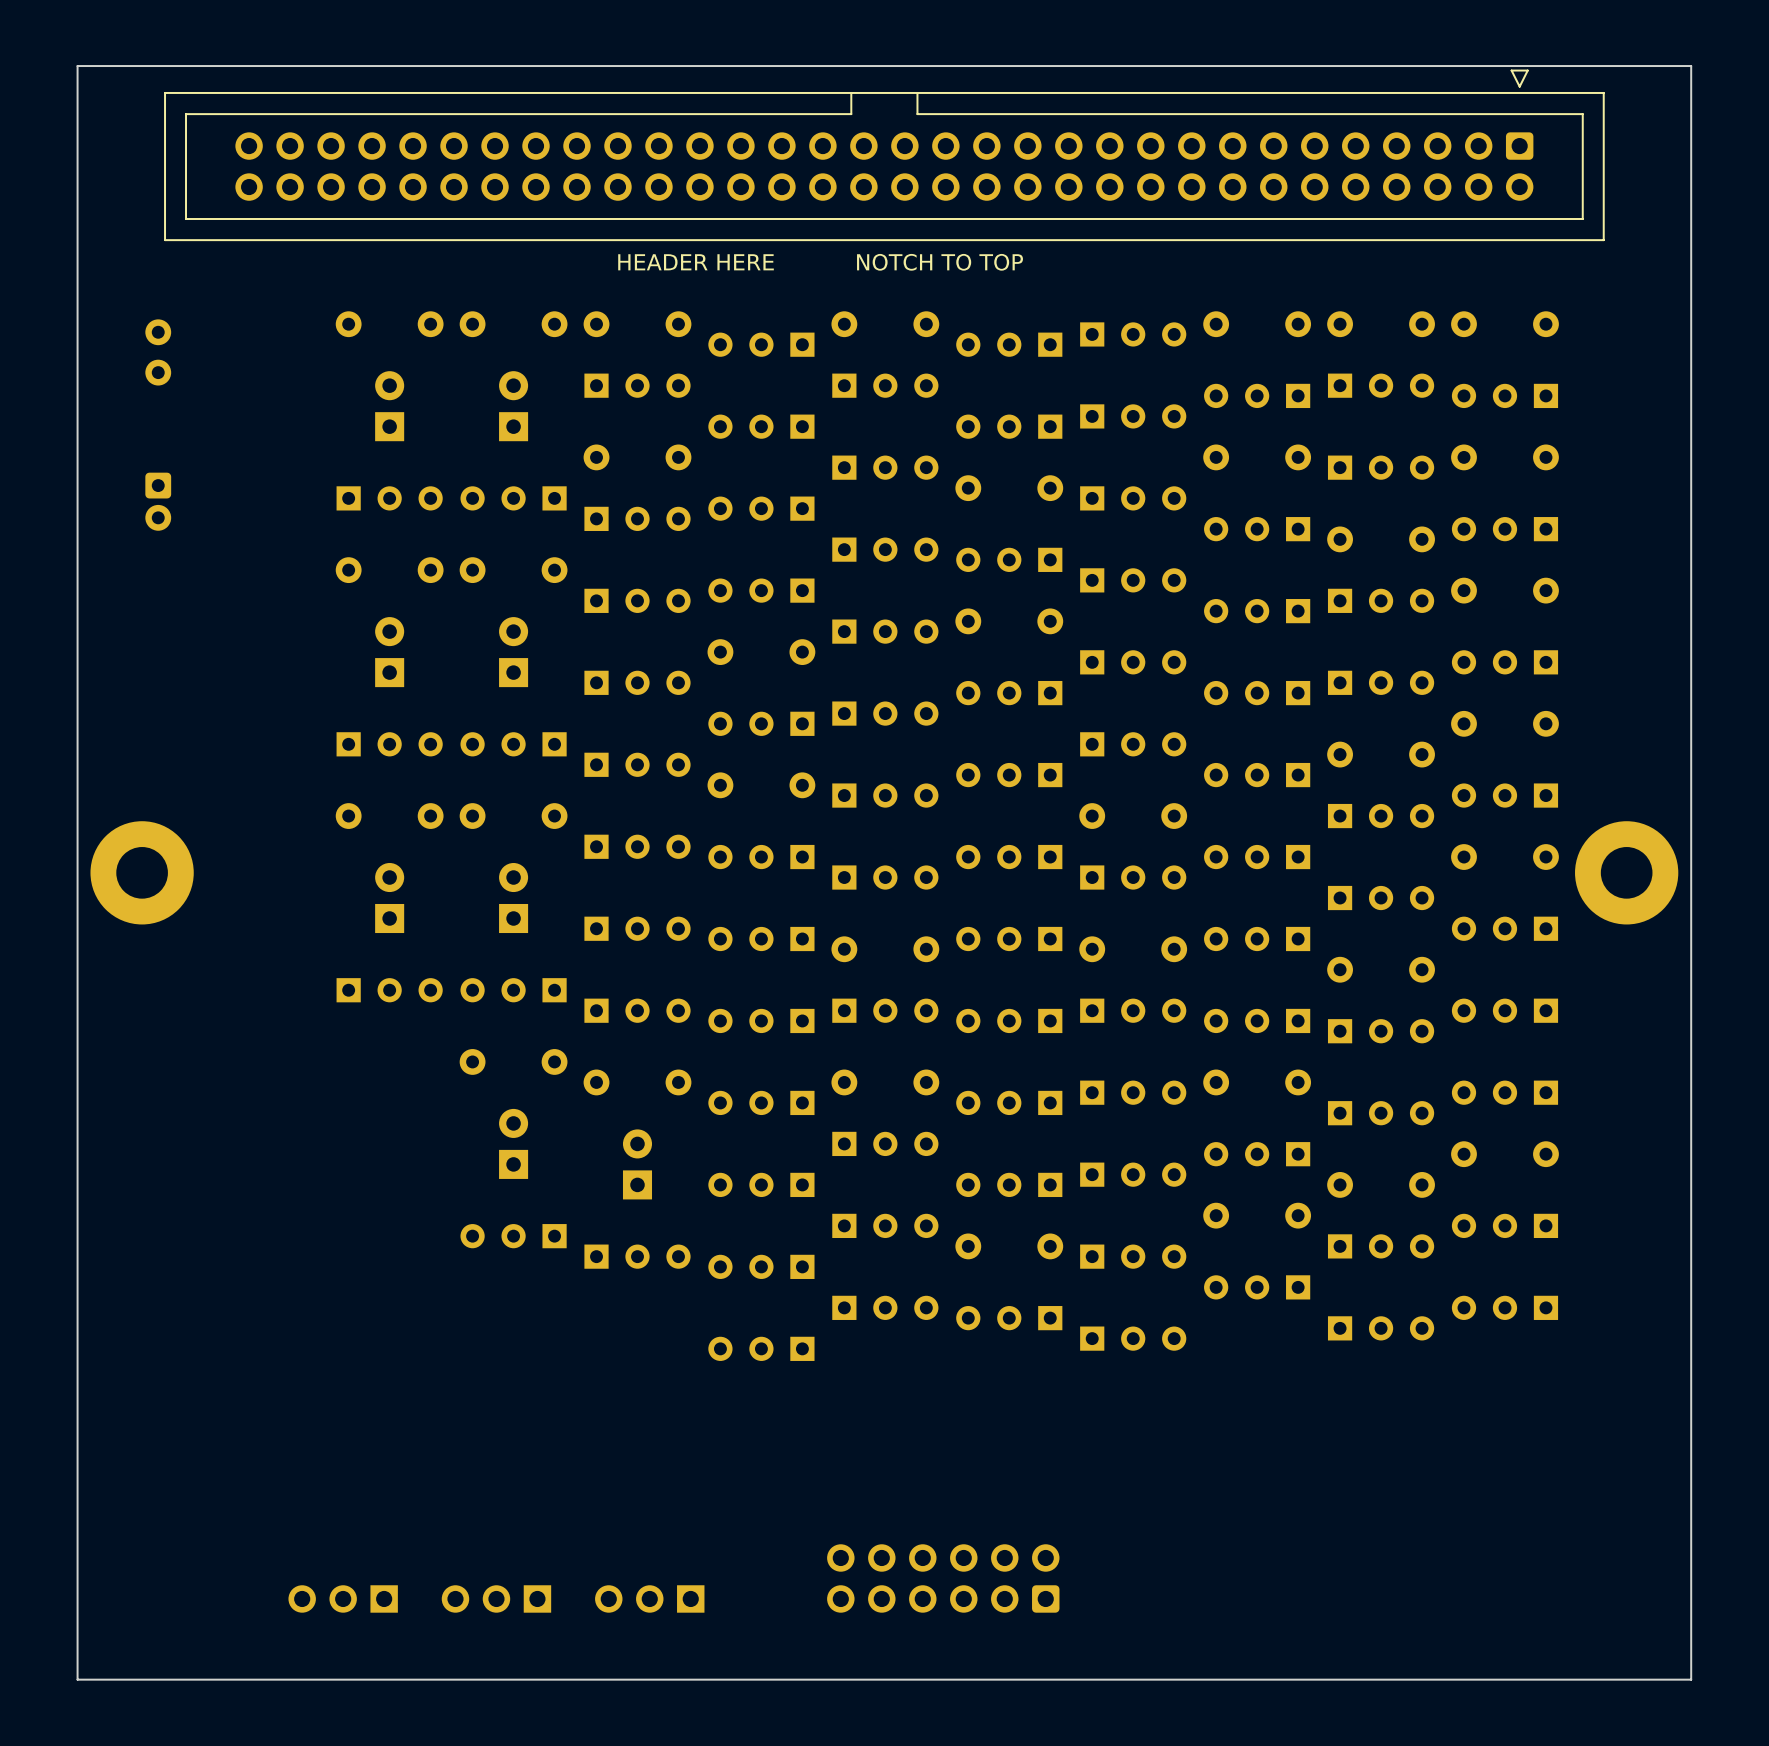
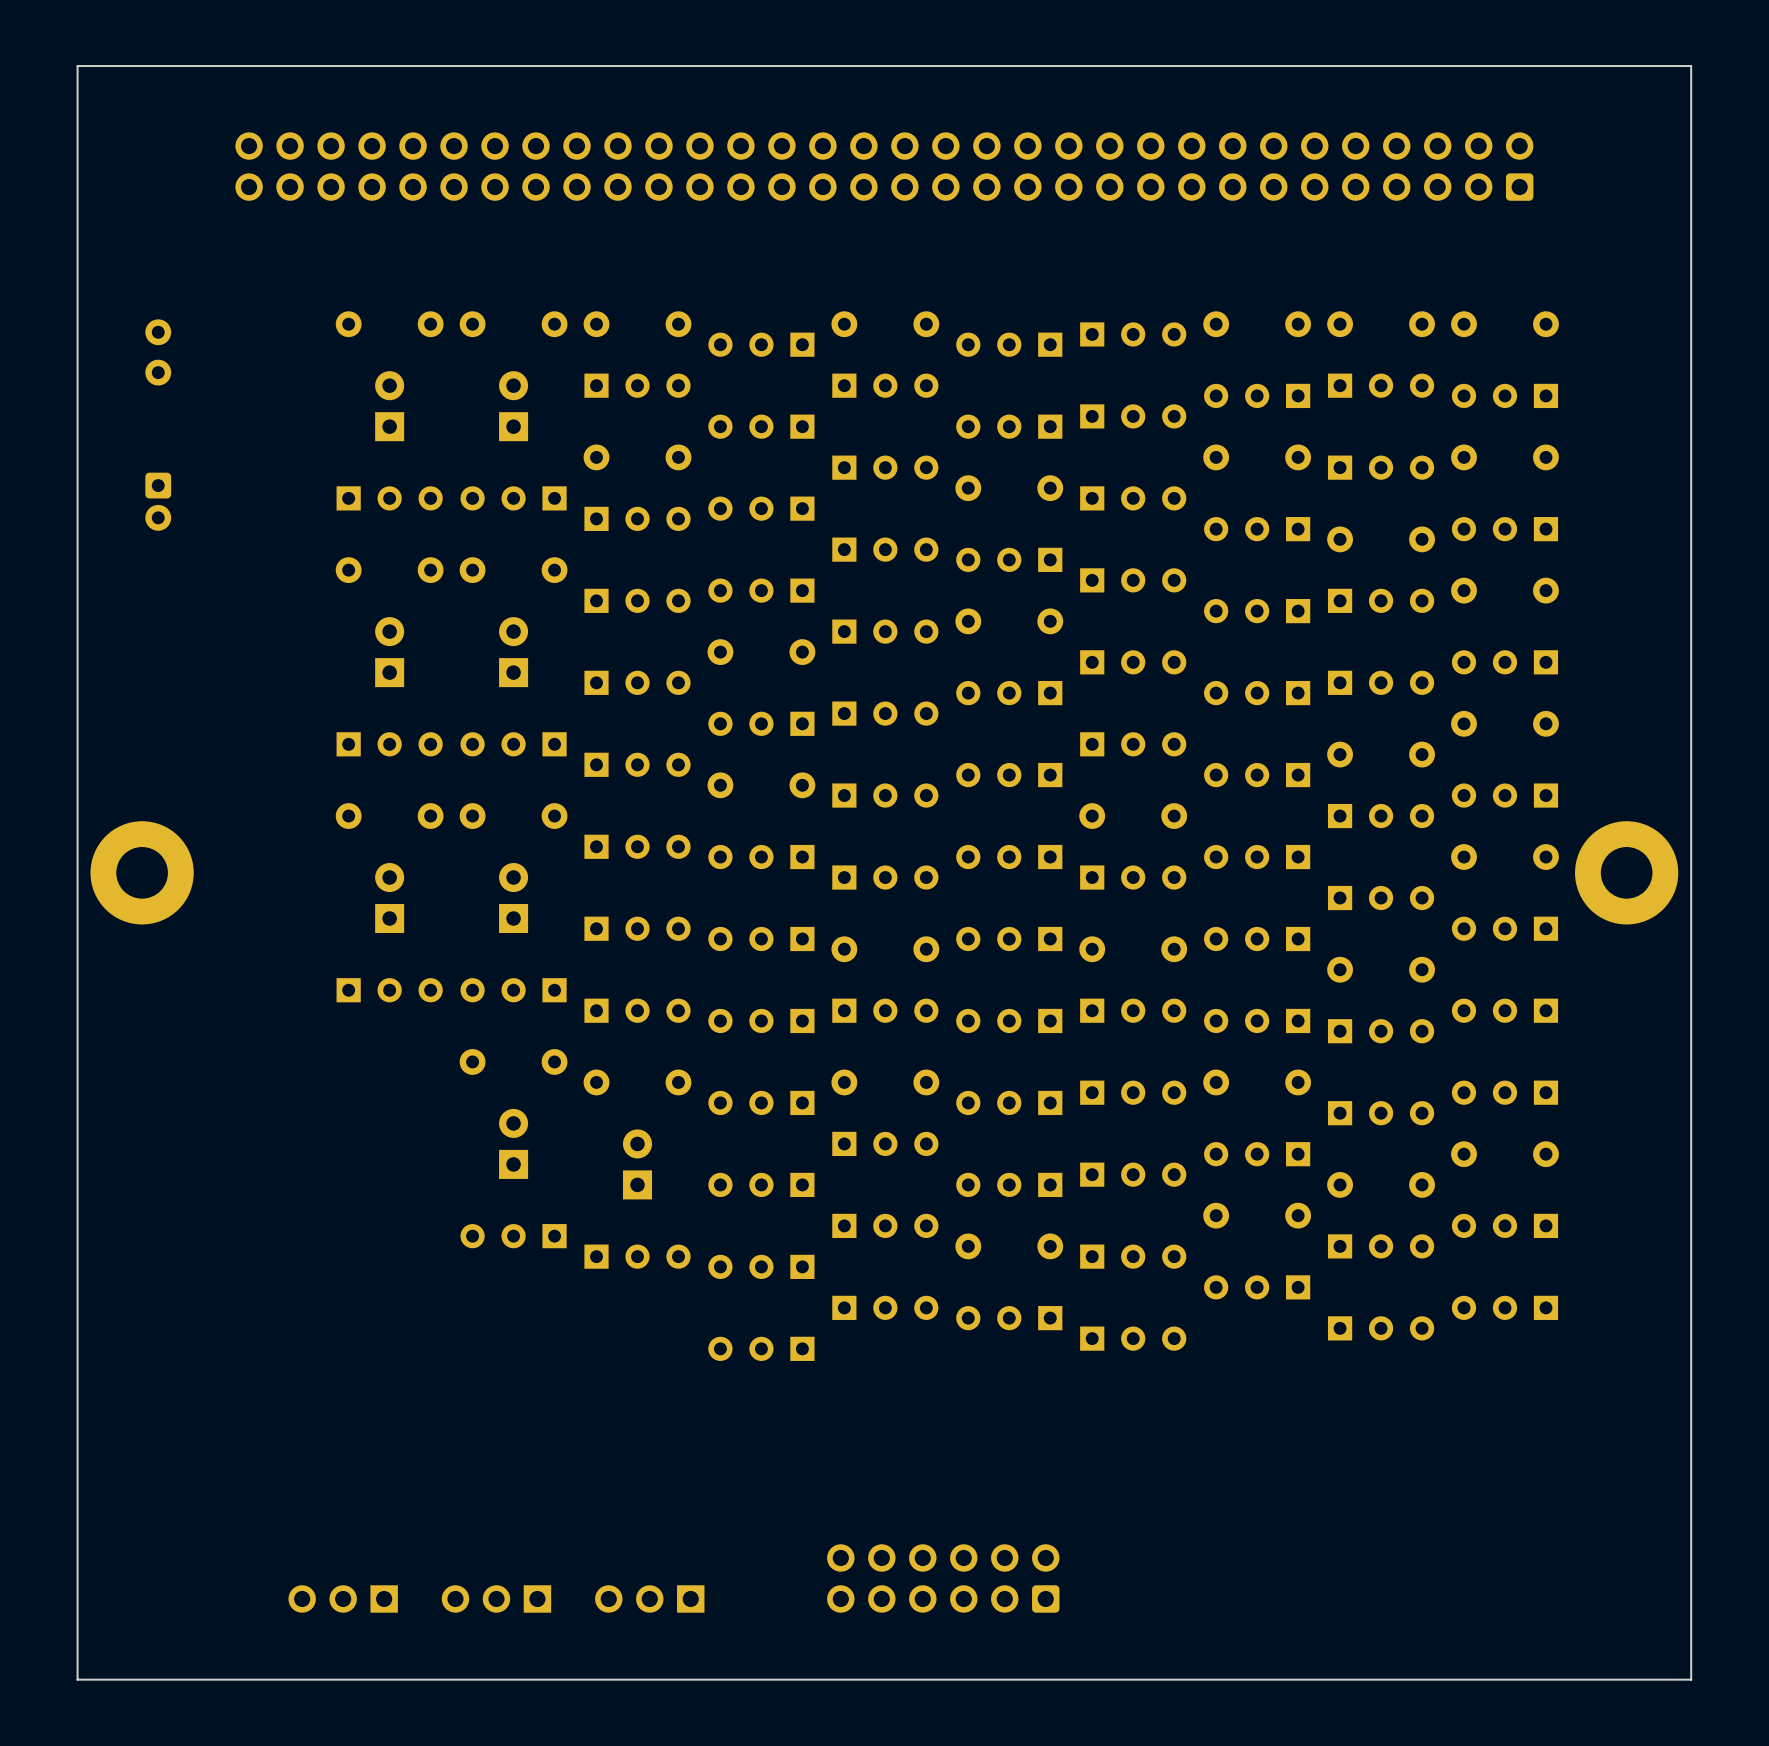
part side: bottom (884, 155) -> top (884, 166)
text: HEADER HERE (696, 262) -> none
text: NOTCH TO TOP (940, 262) -> none

